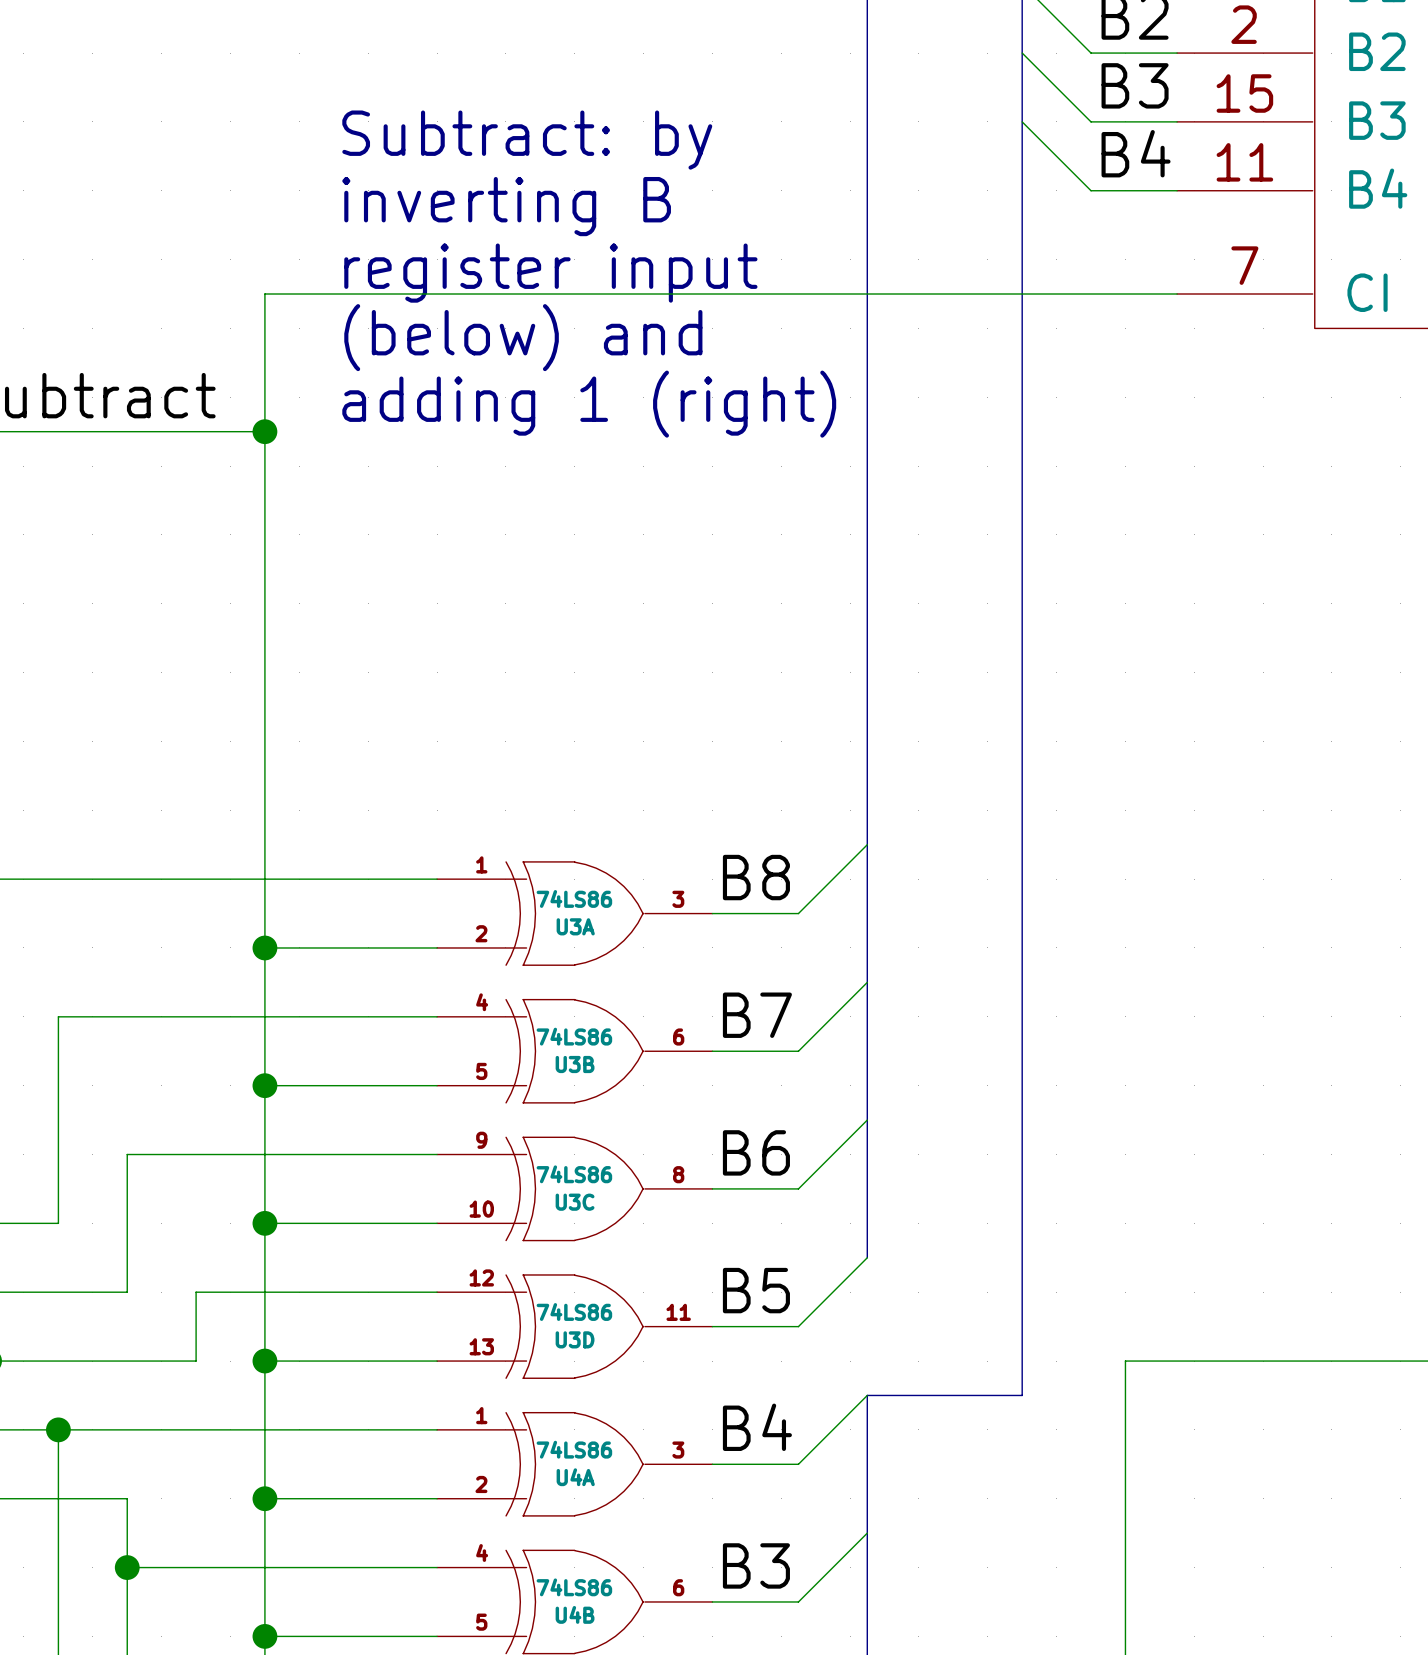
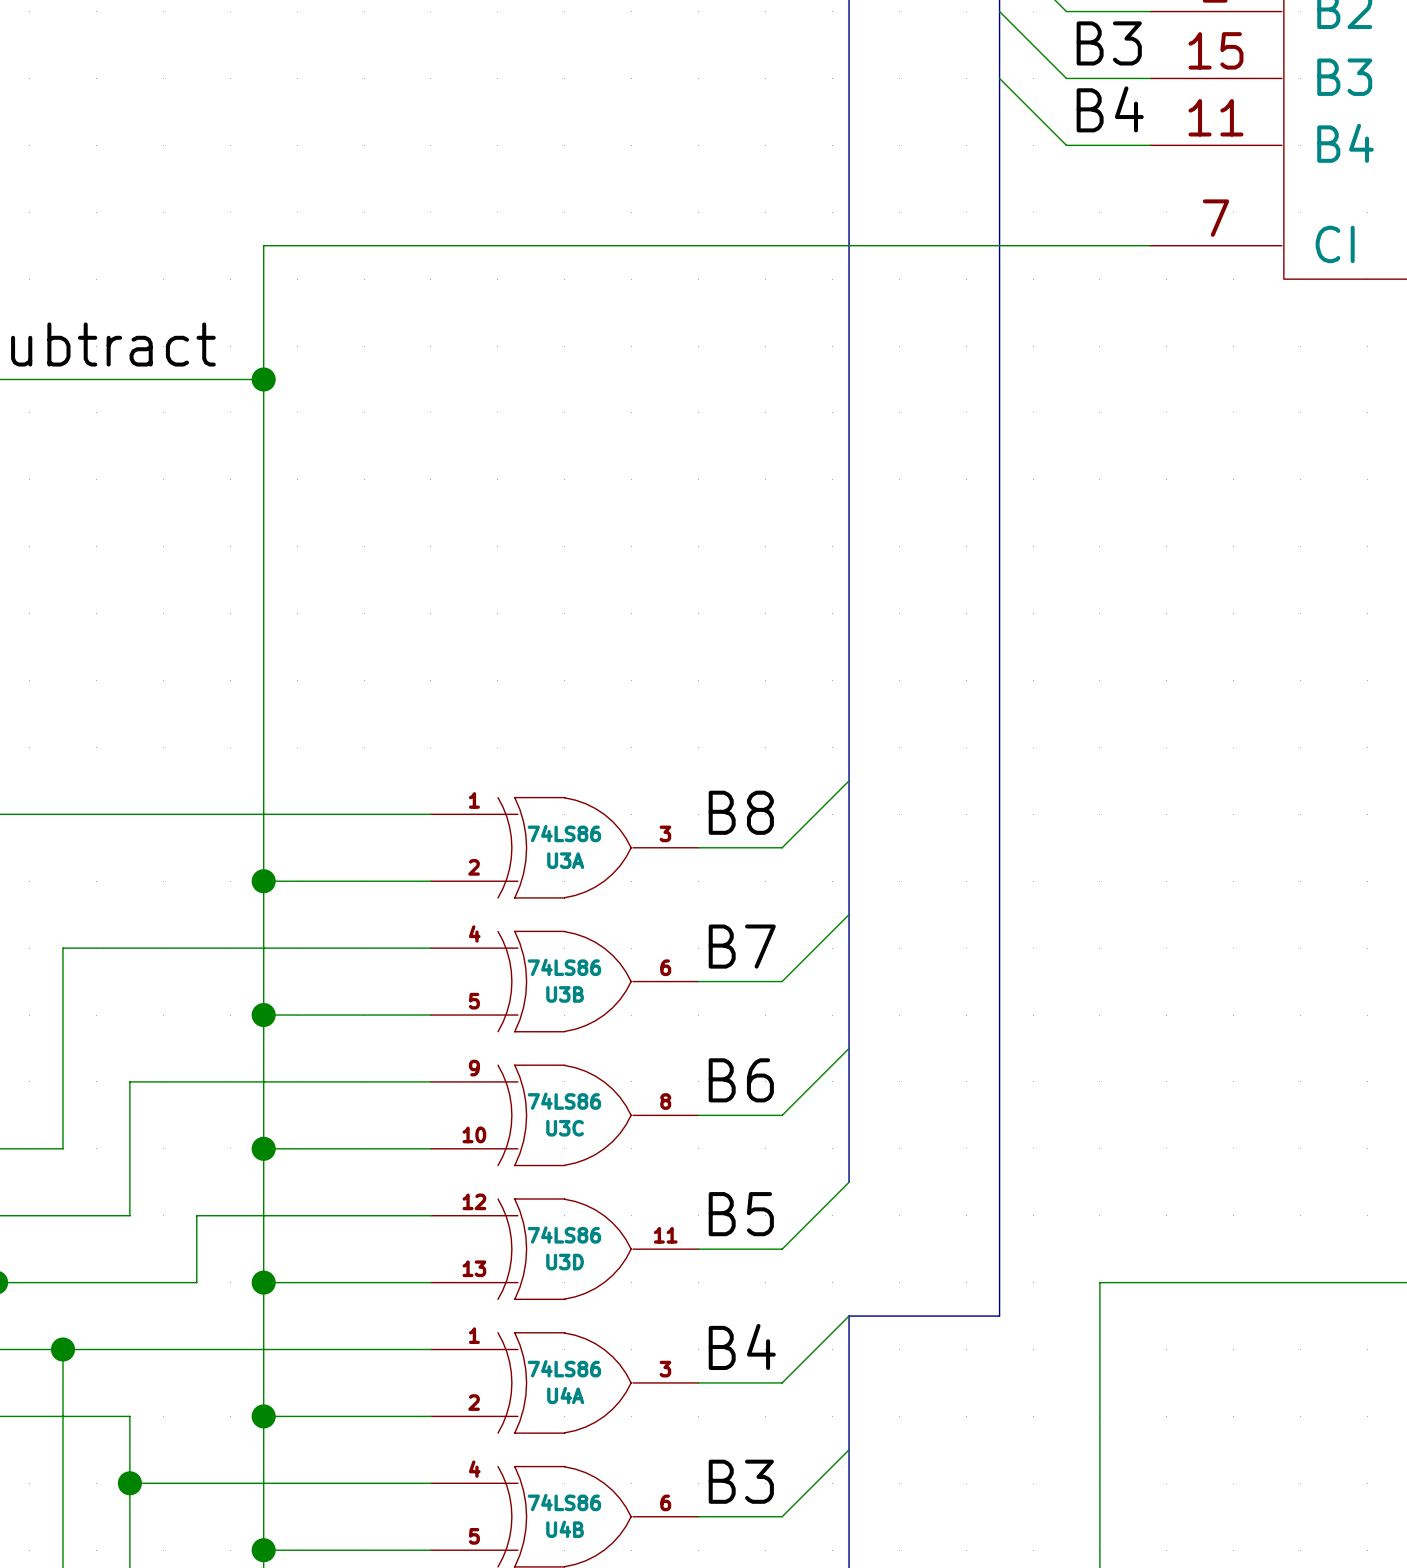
text: Subtract: by (527, 140) -> none
text: inverting B (506, 206) -> none
text: register input (550, 273) -> none
text: (below) and (523, 337) -> none
text: adding 1 (right) (589, 404) -> none

